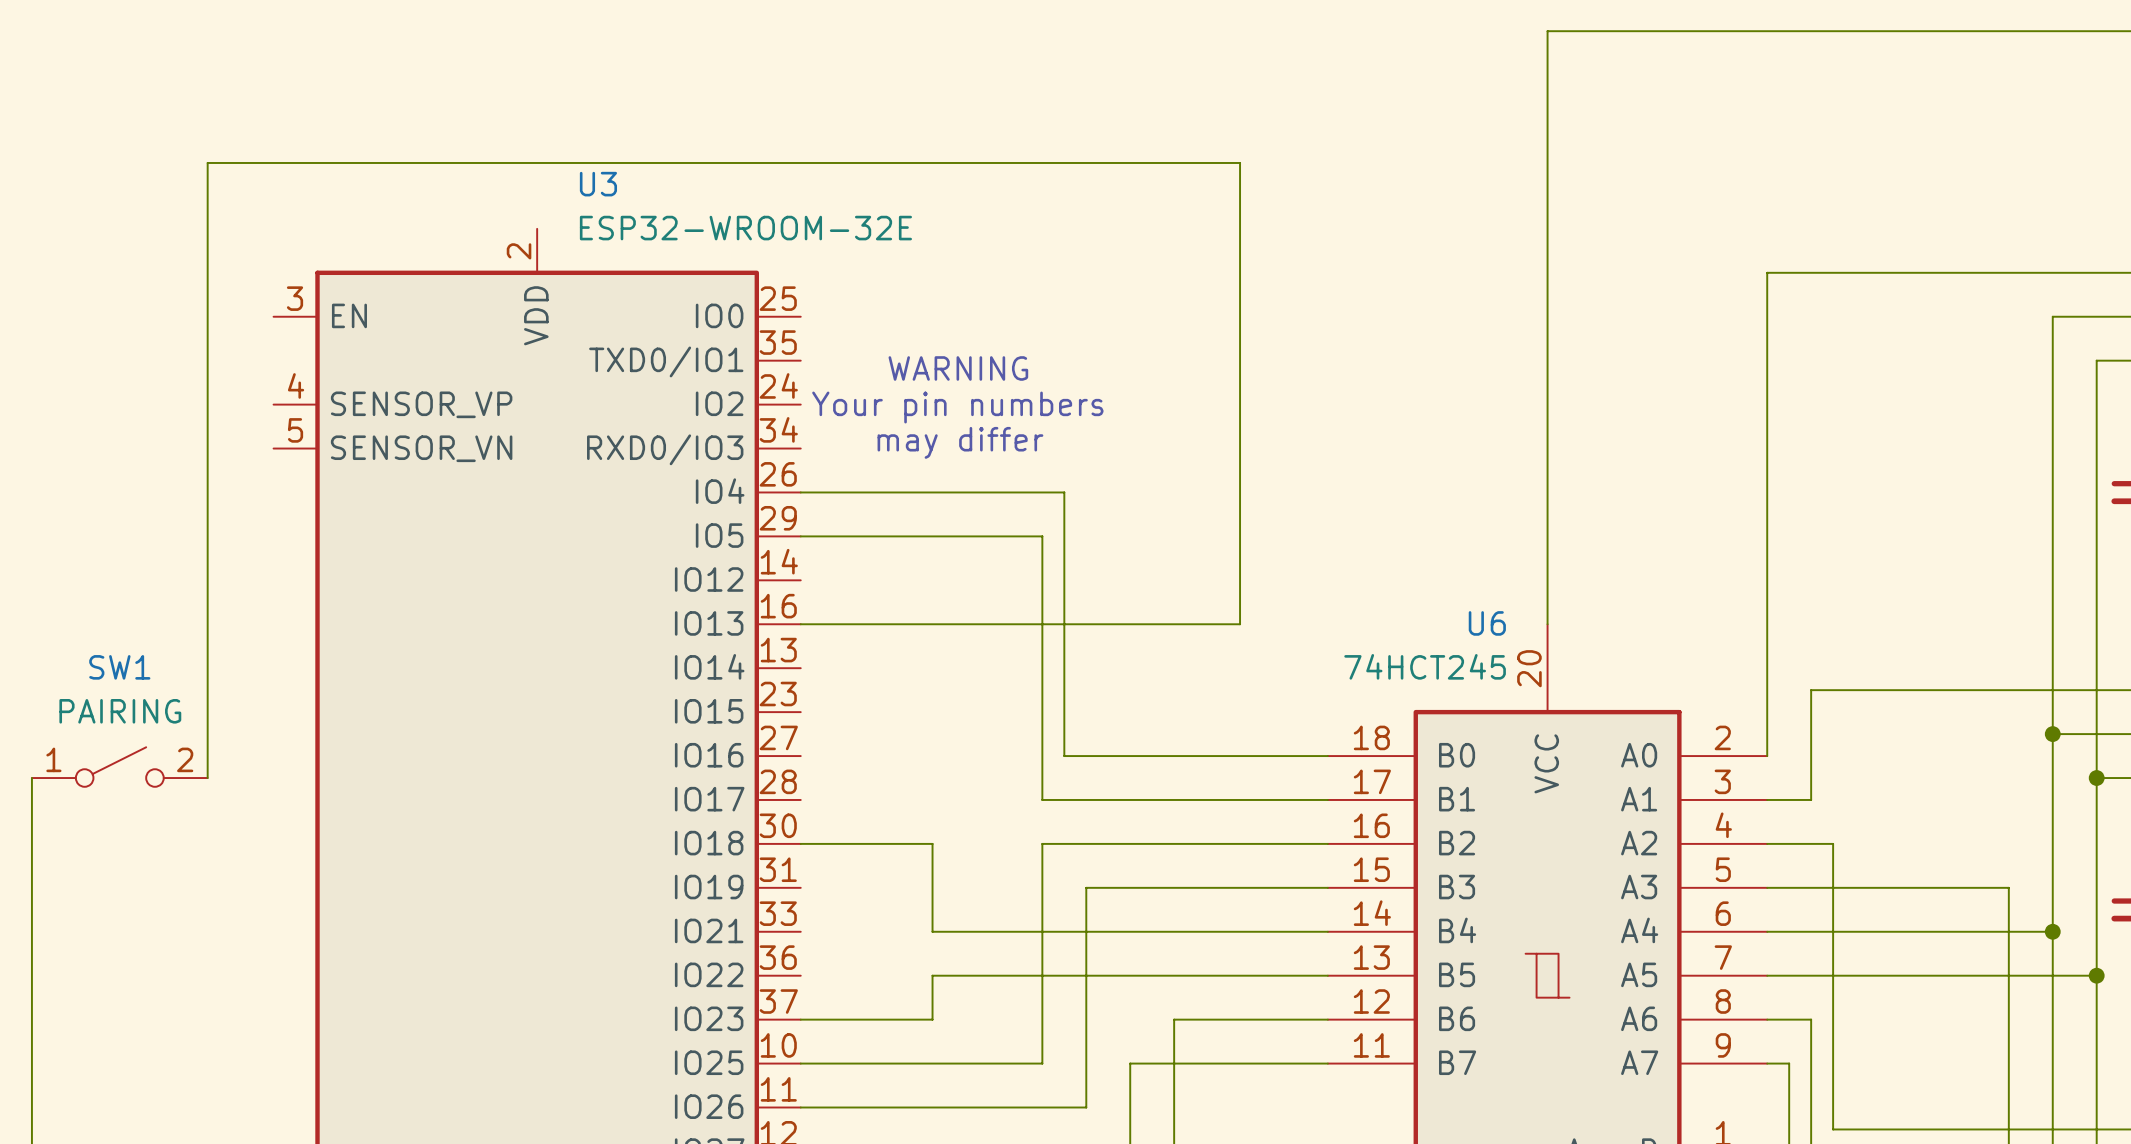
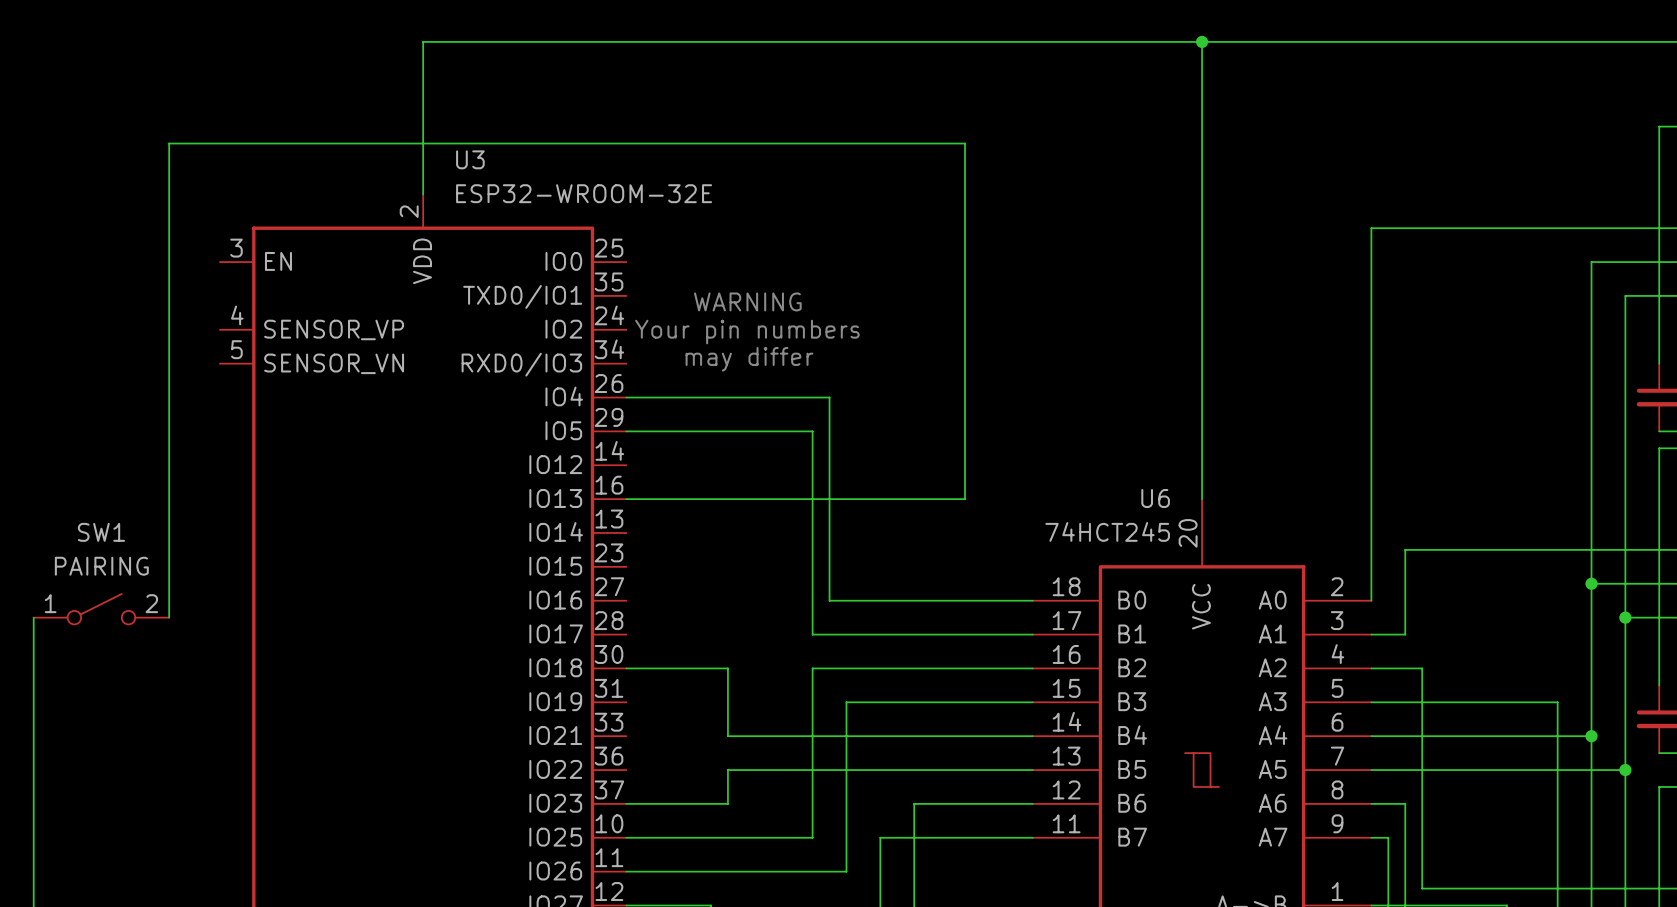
wire: none -> (1202, 41) (423, 41) (423, 194)
junction: none -> (1202, 41)

